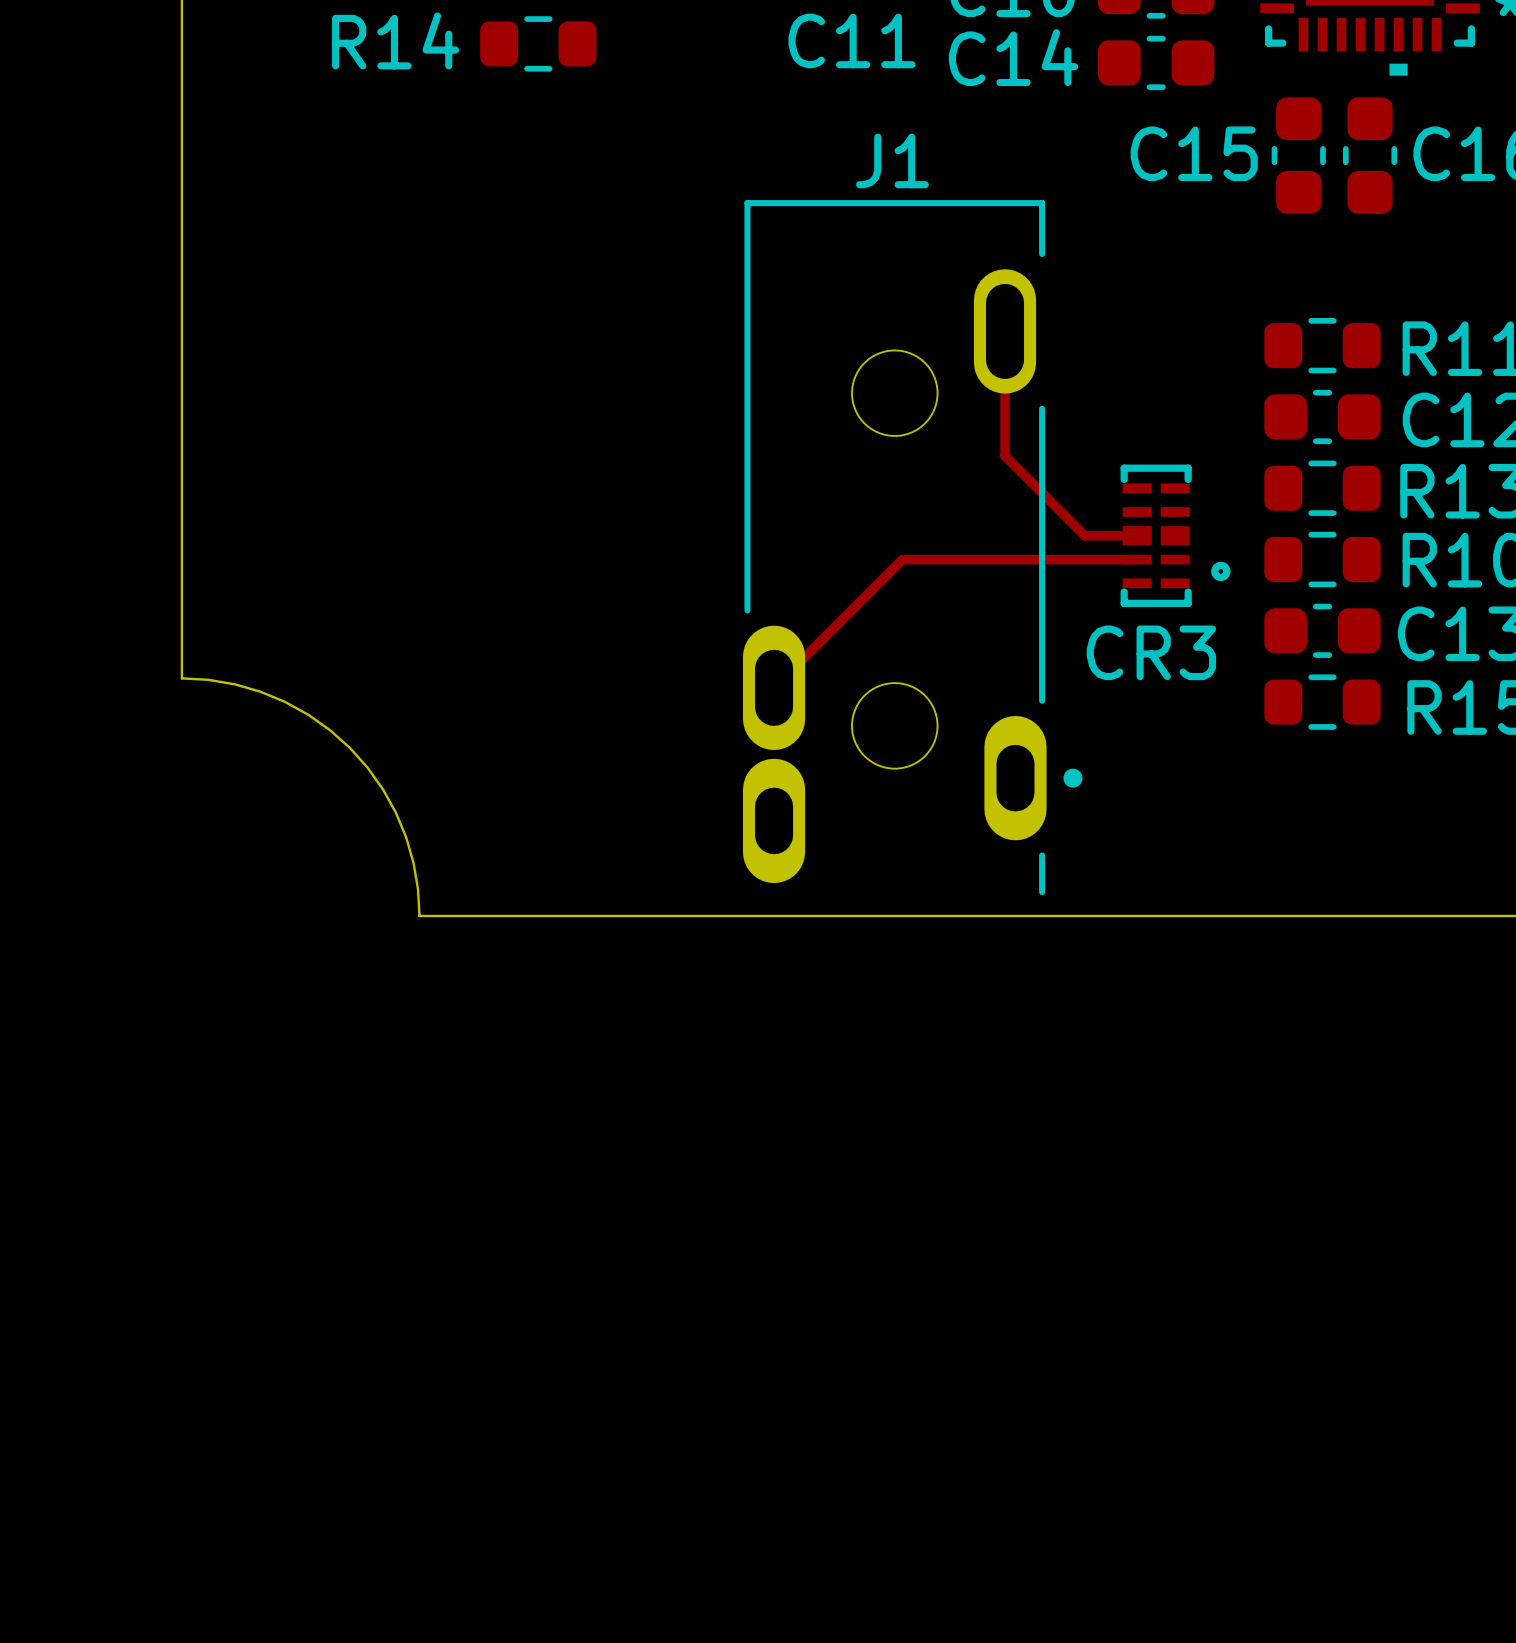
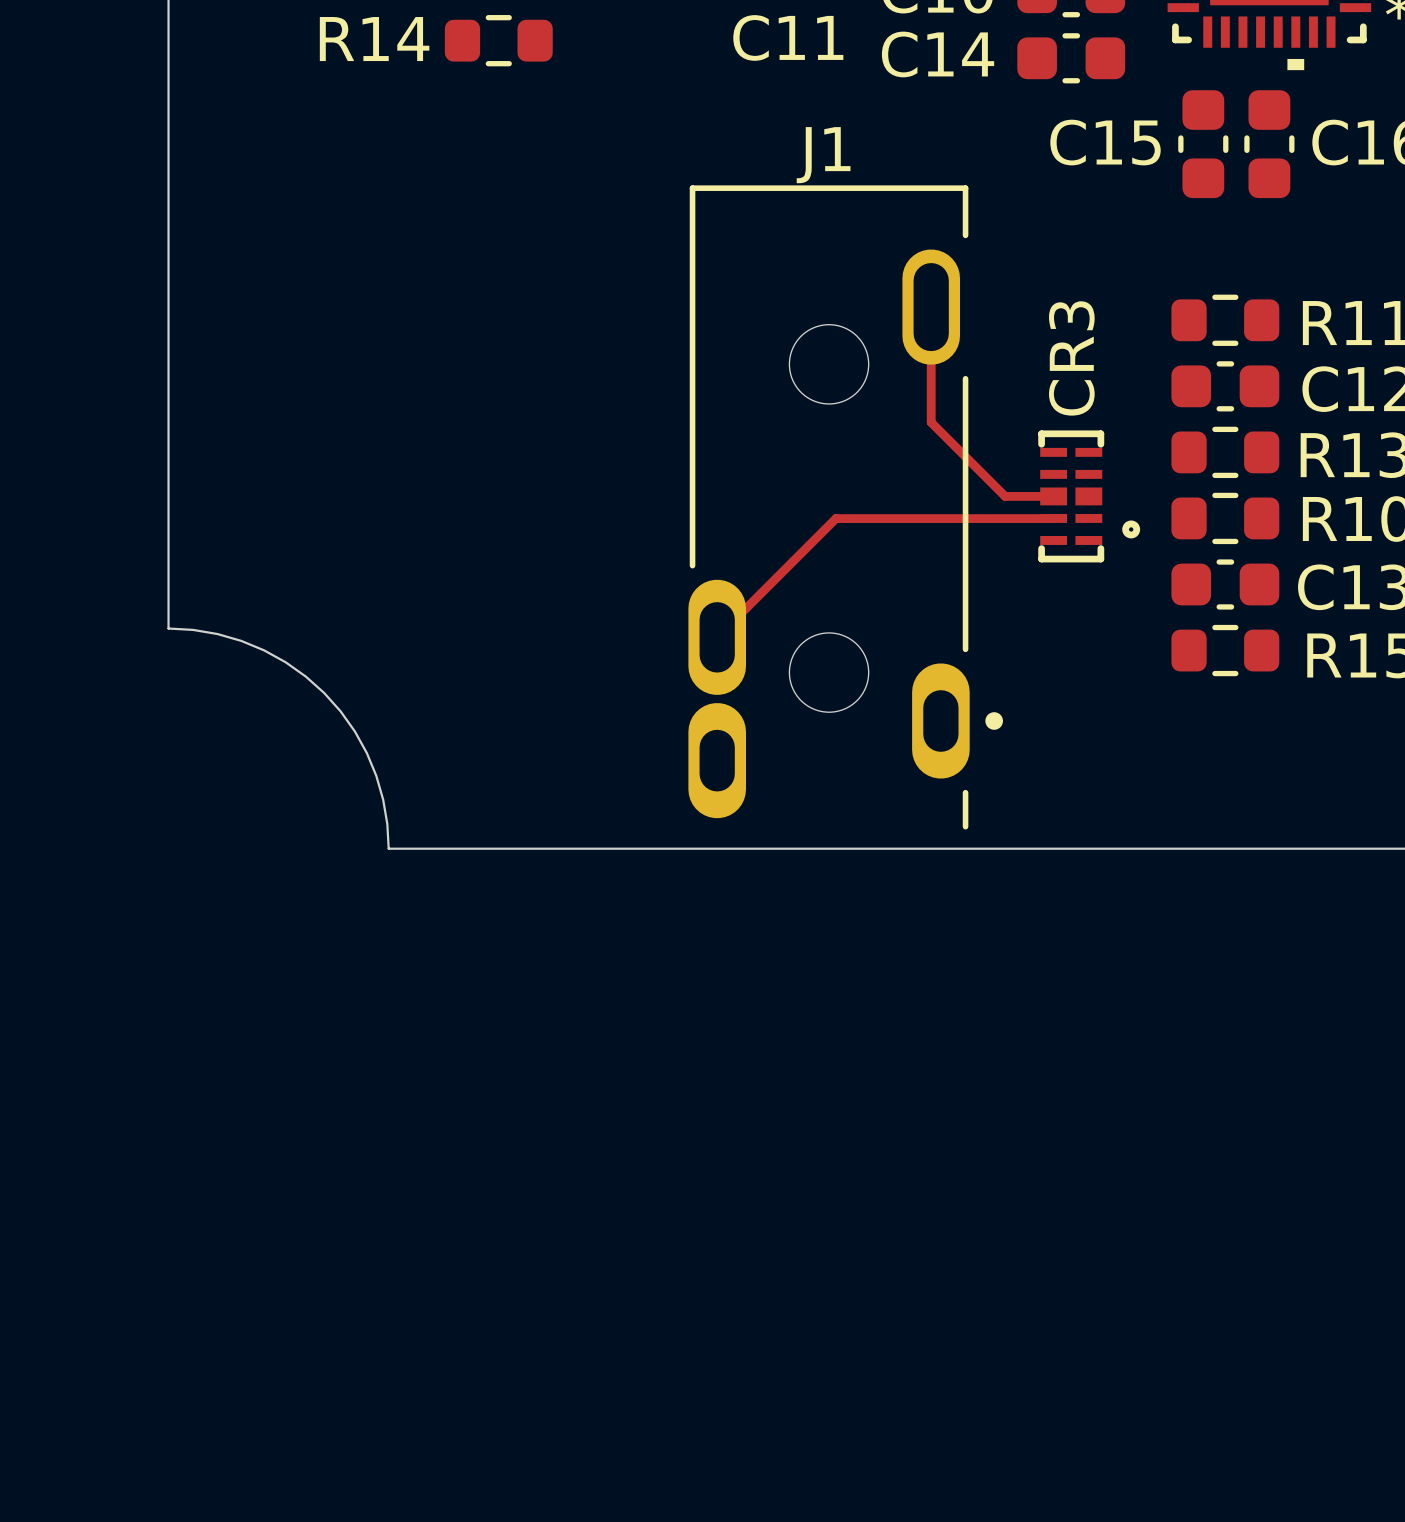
CR3 name rotation: 0° (1151, 652) -> 90° counterclockwise (1071, 358)
CR3 name position: CR3 (1151, 652) -> CR3 (1071, 358)

